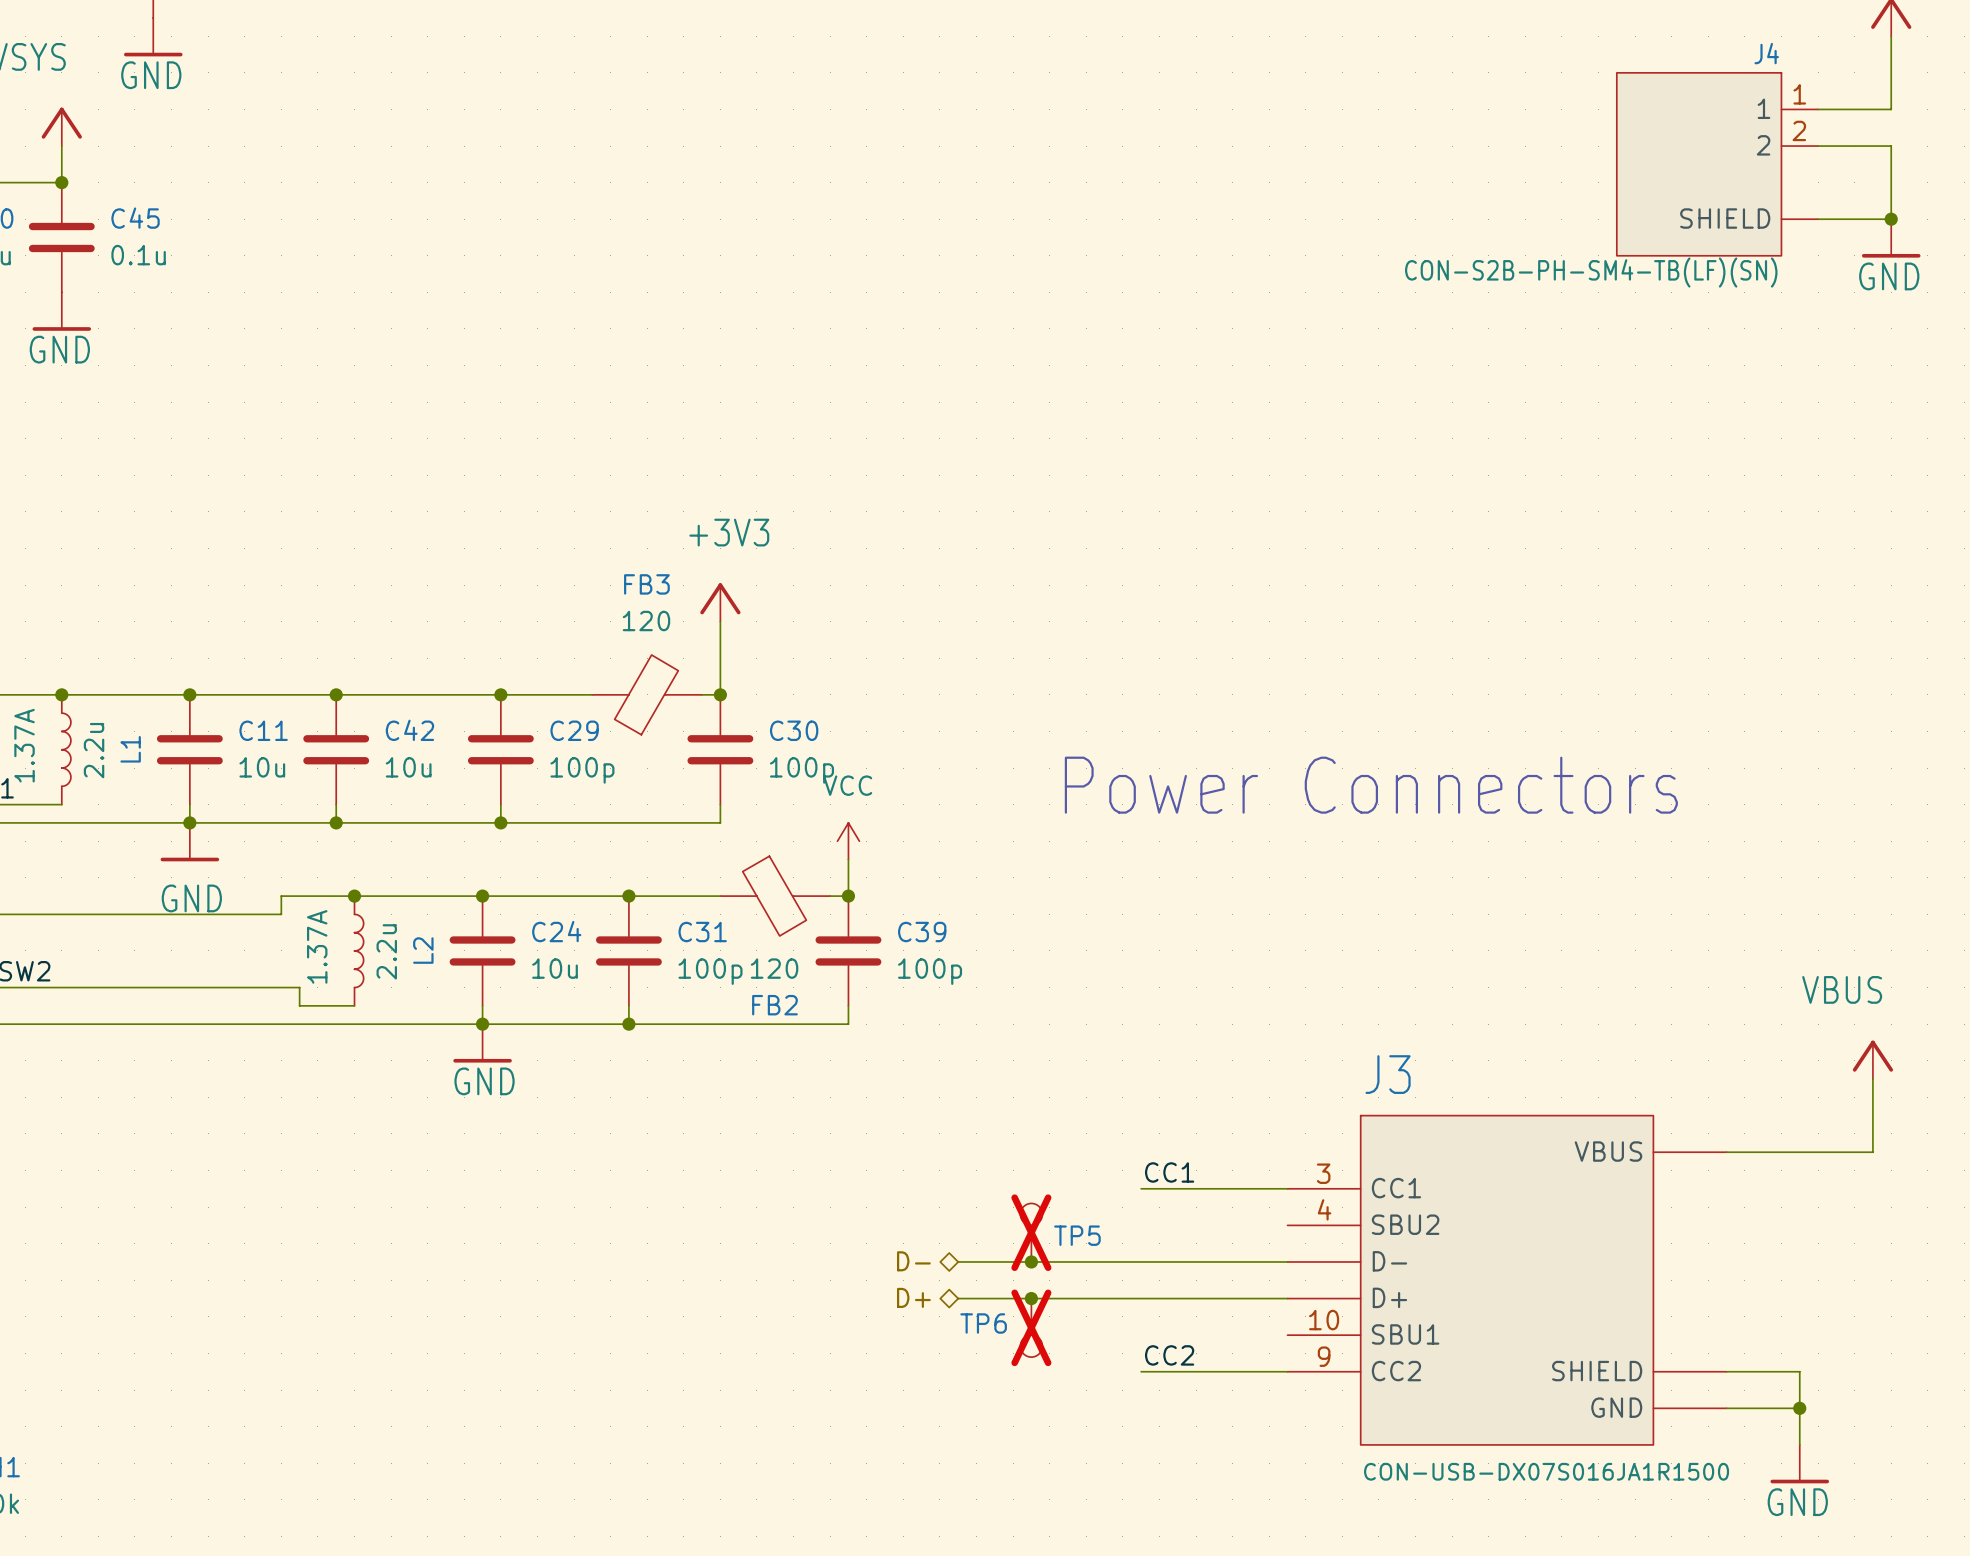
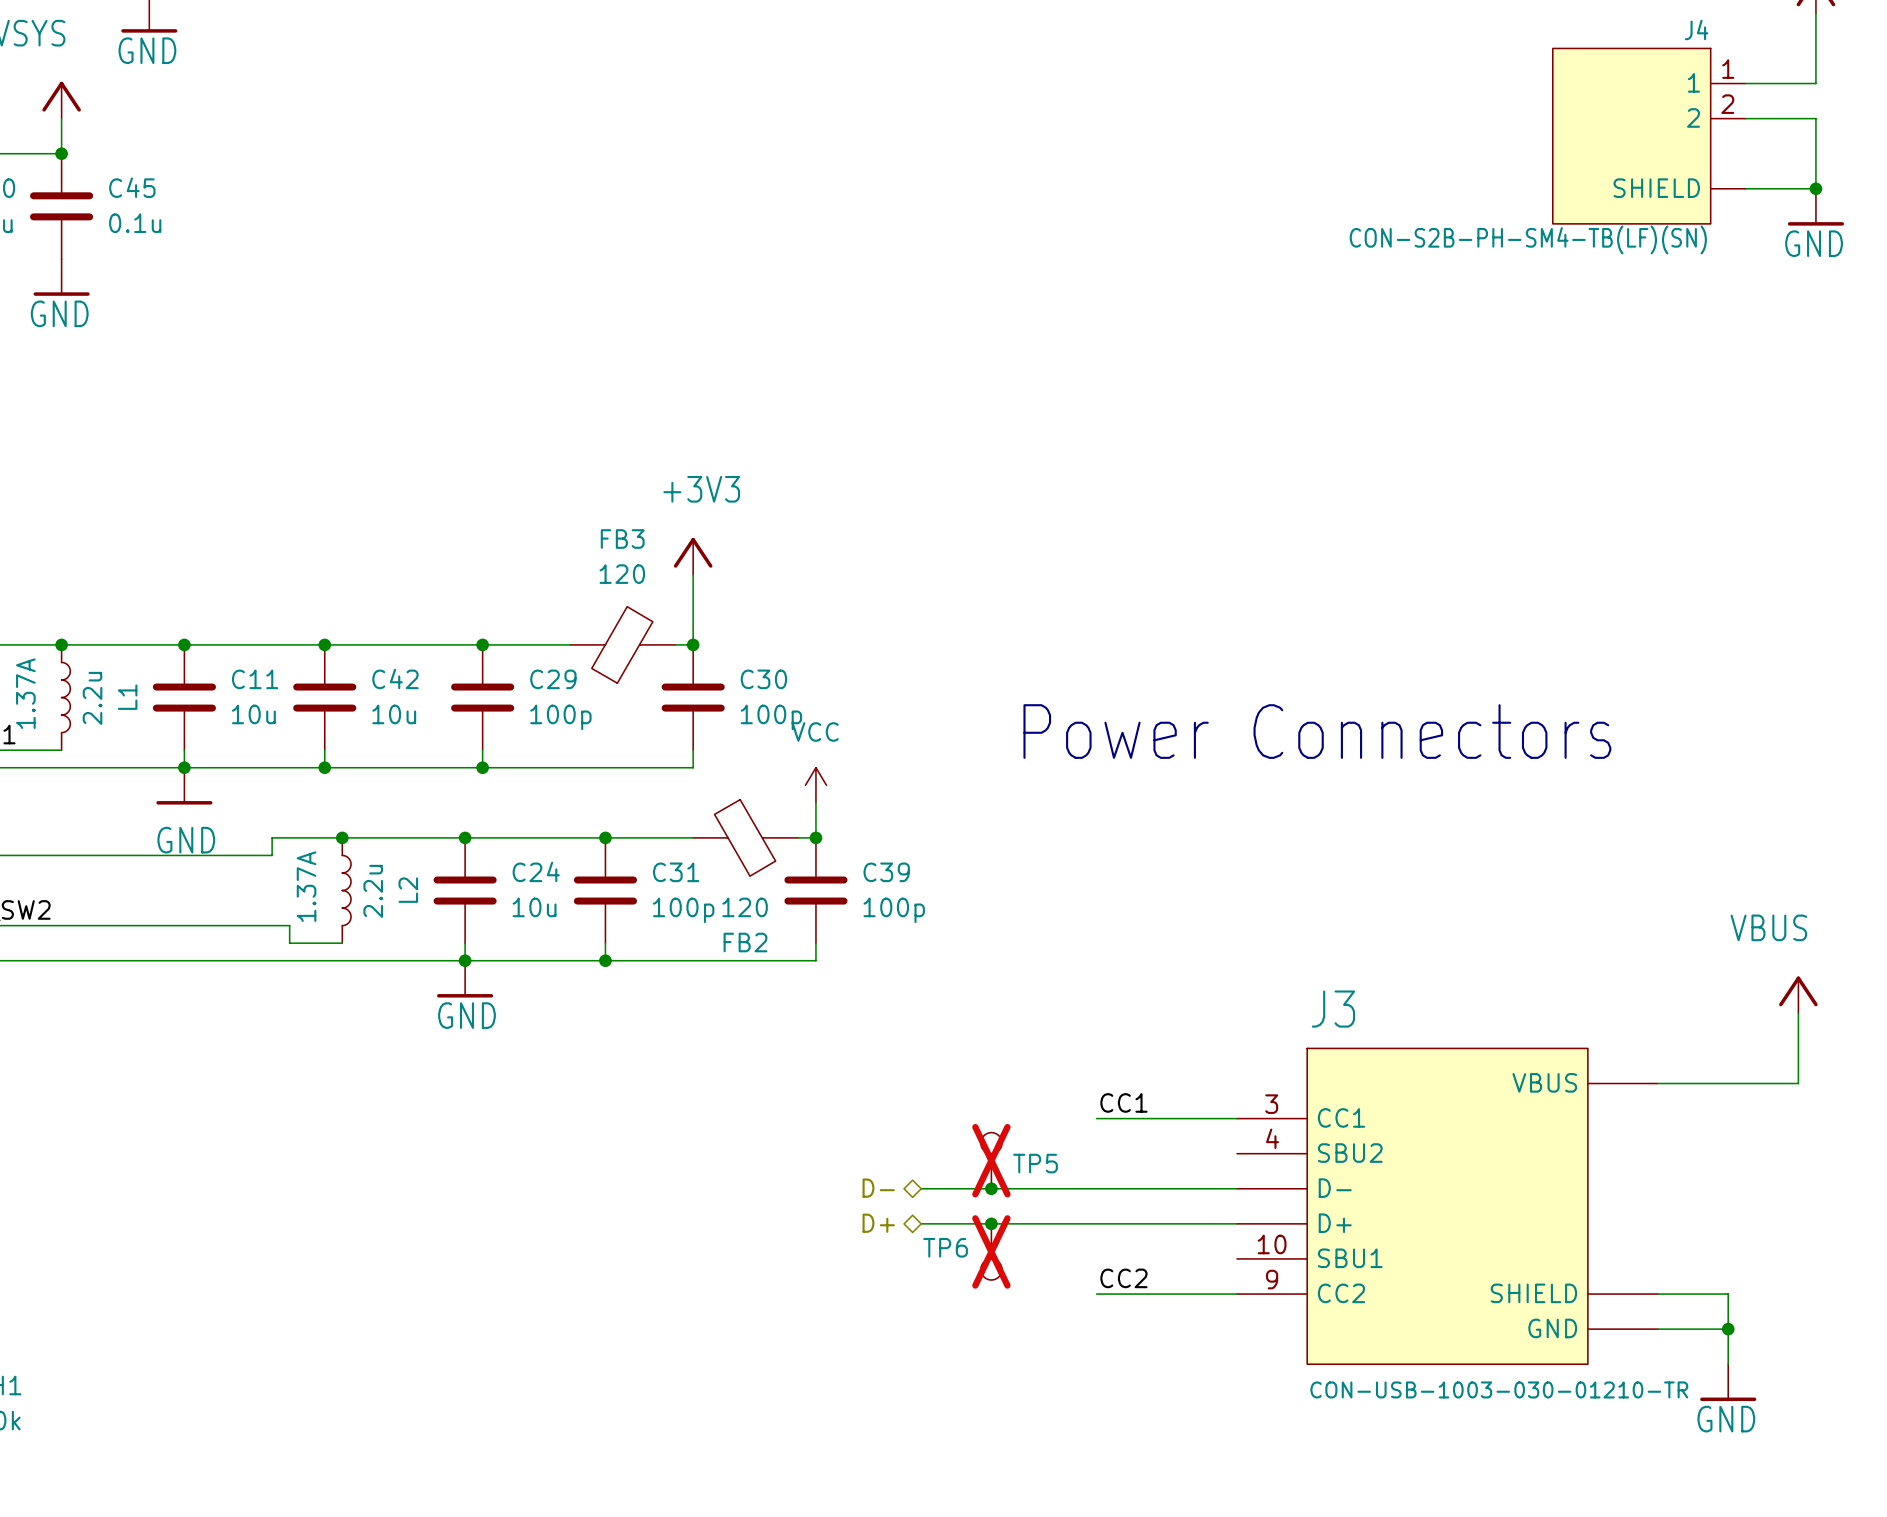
J3 value: CON-USB-DX07S016JA1R1500 (1546, 1471) -> CON-USB-1003-030-01210-TR (1499, 1389)

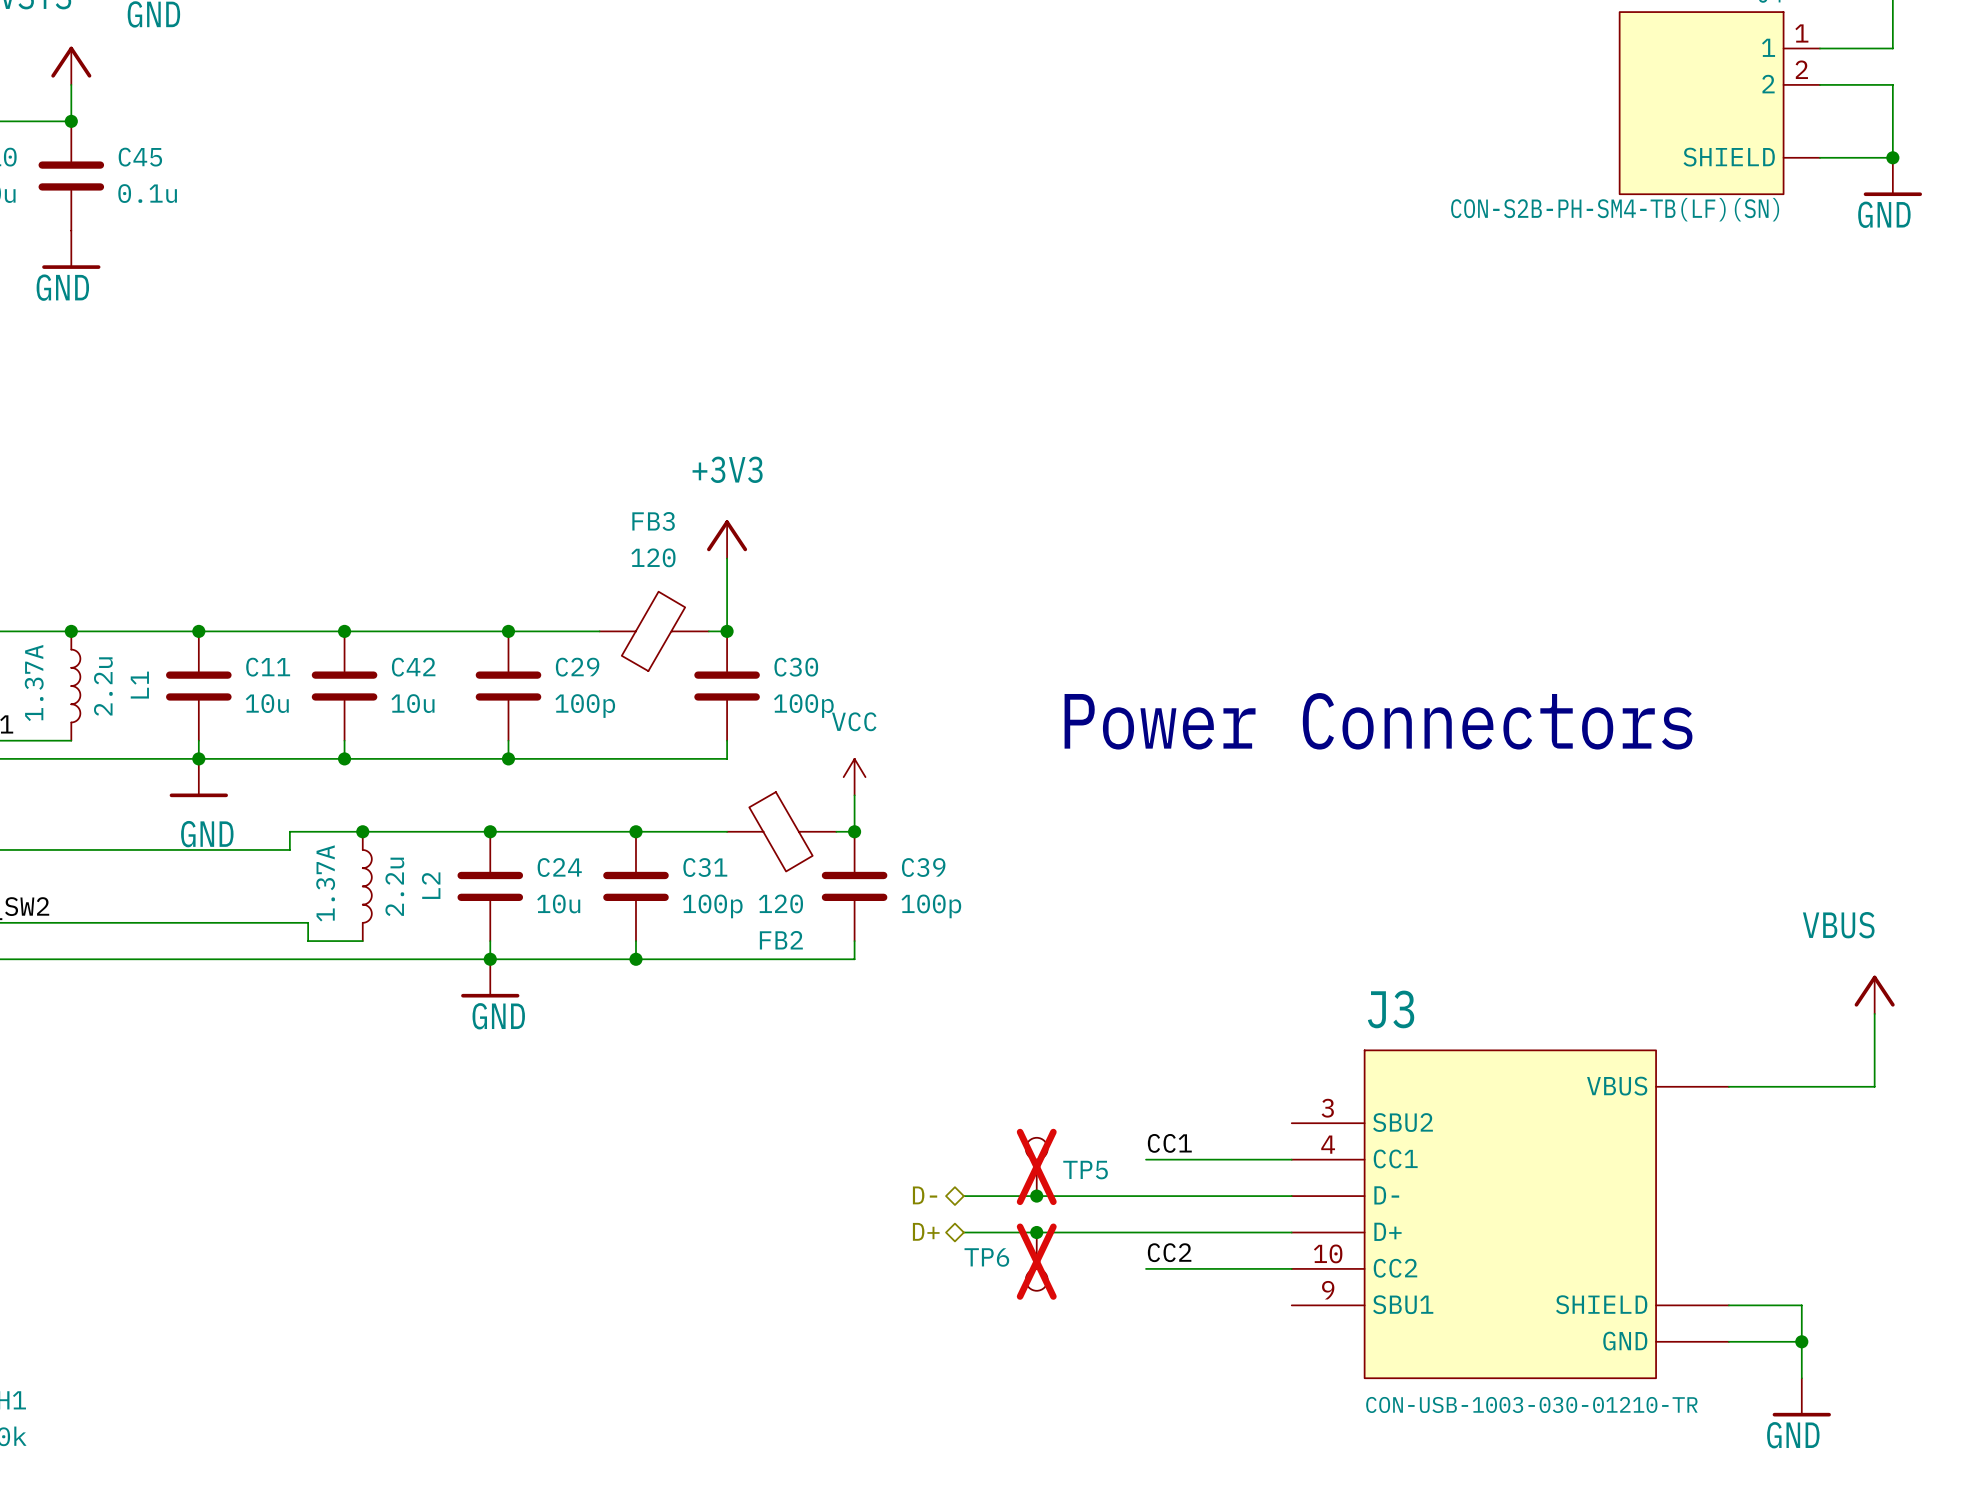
label position: CC1 (1123, 1102) -> CC1 (1169, 1143)
J3 pin name: CC1 (1341, 1117) -> SBU2 (1402, 1122)
wire: (1096, 1118) (1237, 1118) -> (1146, 1159) (1291, 1159)
J3 pin name: SBU2 (1350, 1153) -> CC1 (1395, 1158)
J3 pin name: SBU1 (1350, 1258) -> CC2 (1395, 1268)
label position: CC2 (1123, 1278) -> CC2 (1169, 1252)
J3 pin name: CC2 (1341, 1293) -> SBU1 (1403, 1304)
wire: (1096, 1294) (1237, 1294) -> (1146, 1268) (1291, 1268)

